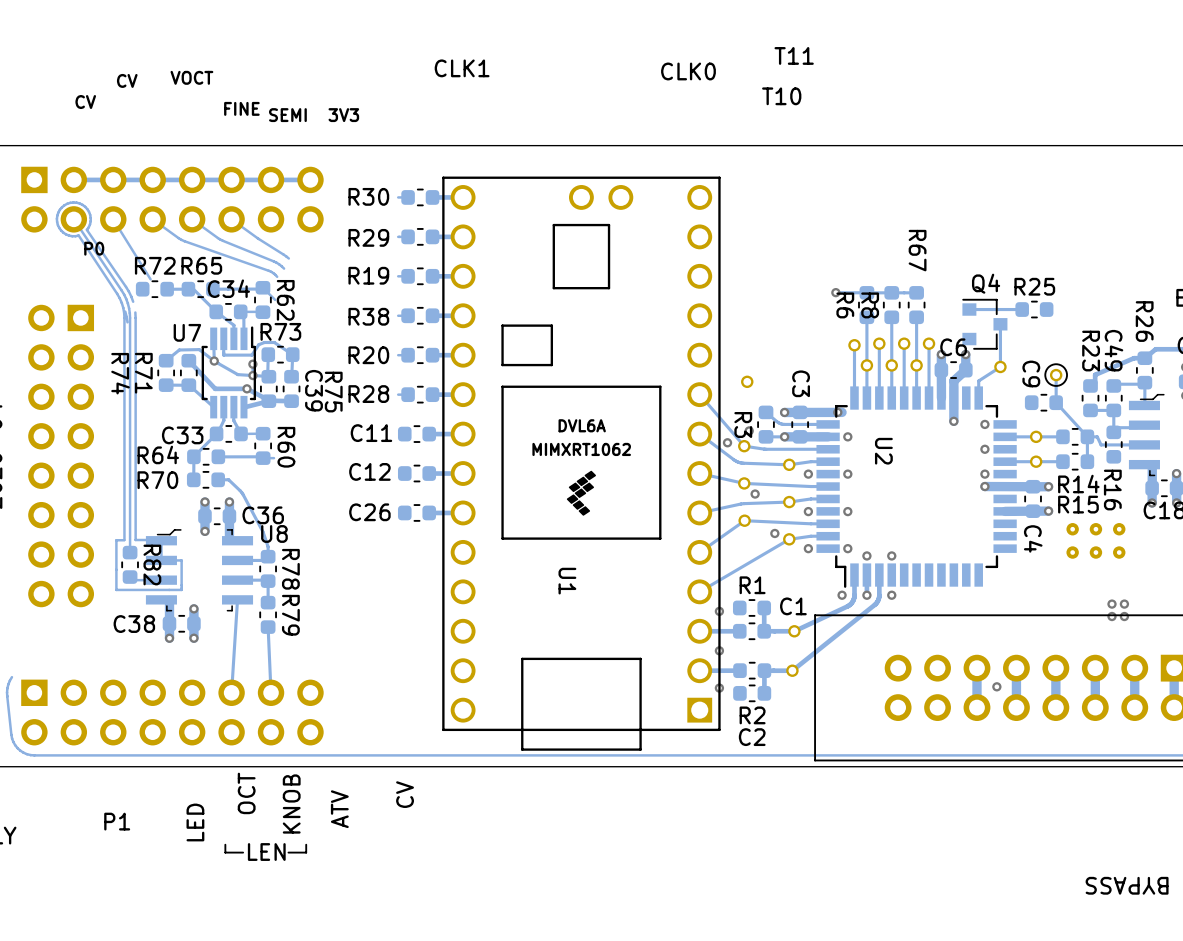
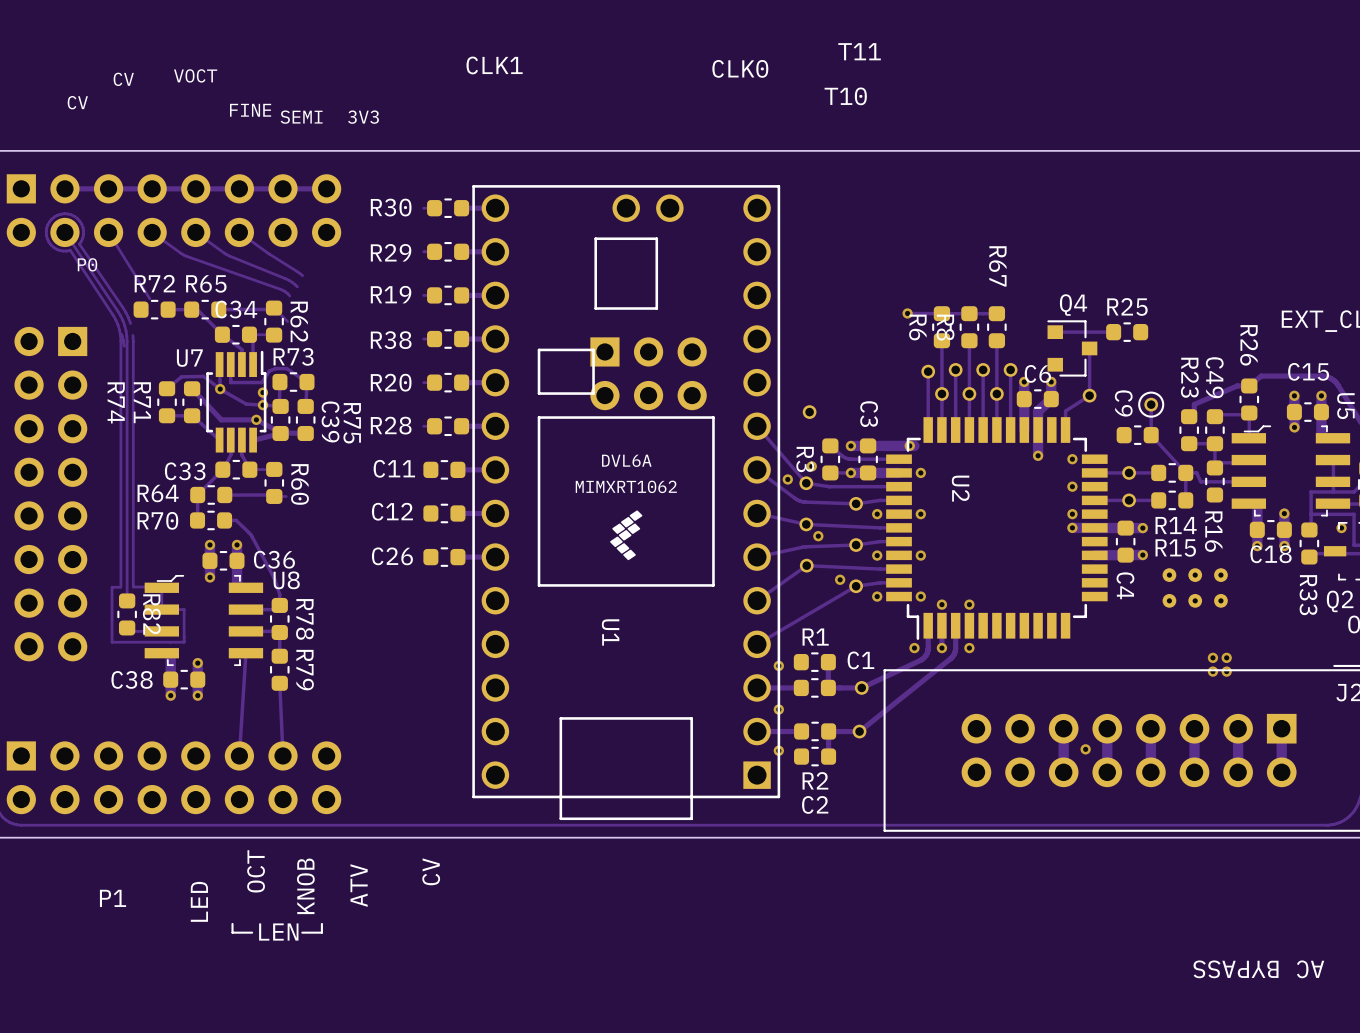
part: none -> (648, 373)

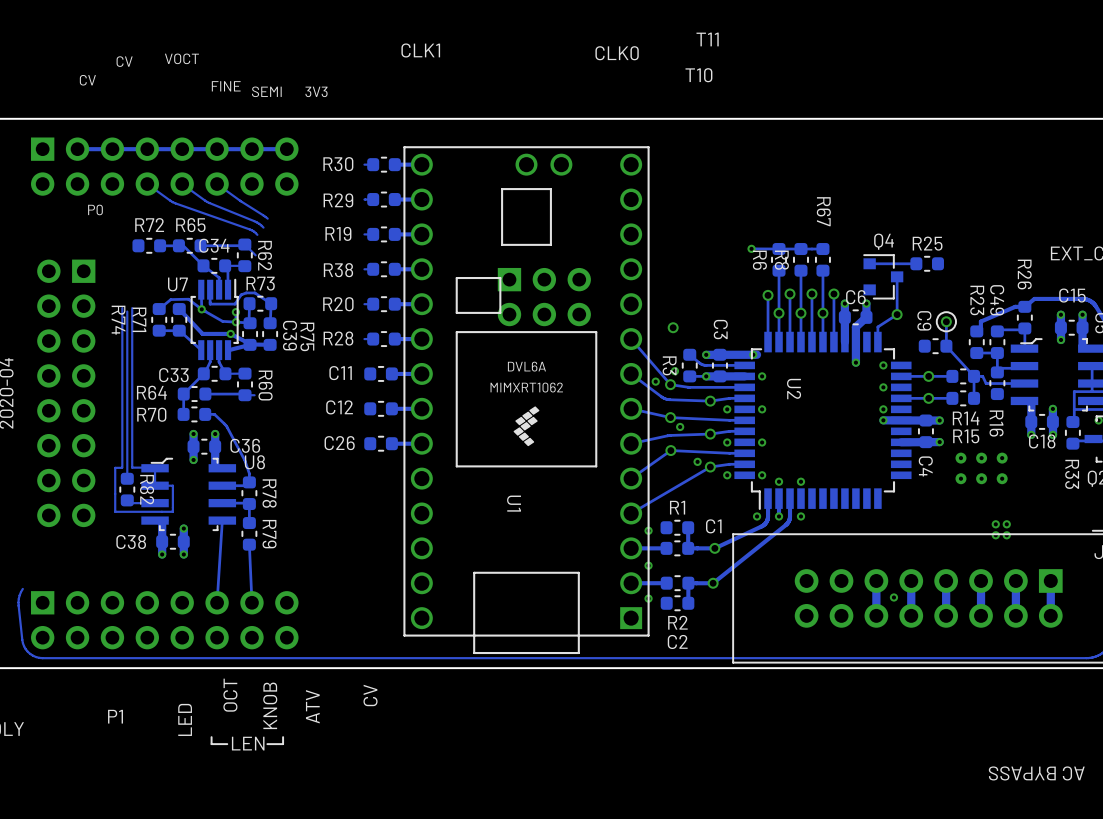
track: (64, 232) (117, 311) (126, 330) (127, 600) -> (127, 311) (127, 478)
track: (108, 232) (149, 298) -> none
track: (79, 243) (122, 307) (130, 323) -> none
track: (79, 244) (83, 230) (79, 221) (68, 213) (54, 216) (46, 228) (47, 238) (56, 249) (70, 250) -> none
track: (70, 250) (118, 324) (120, 341) (120, 387) -> none
track: (121, 334) (124, 346) -> none
track: (132, 335) (133, 387) -> none

